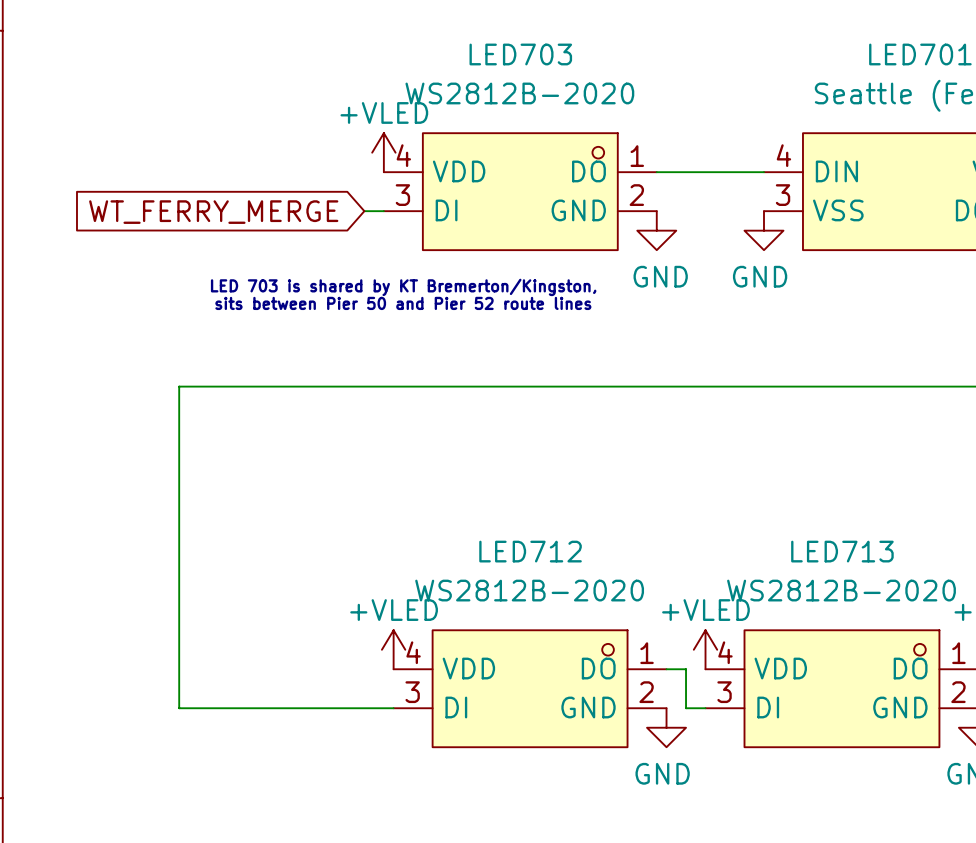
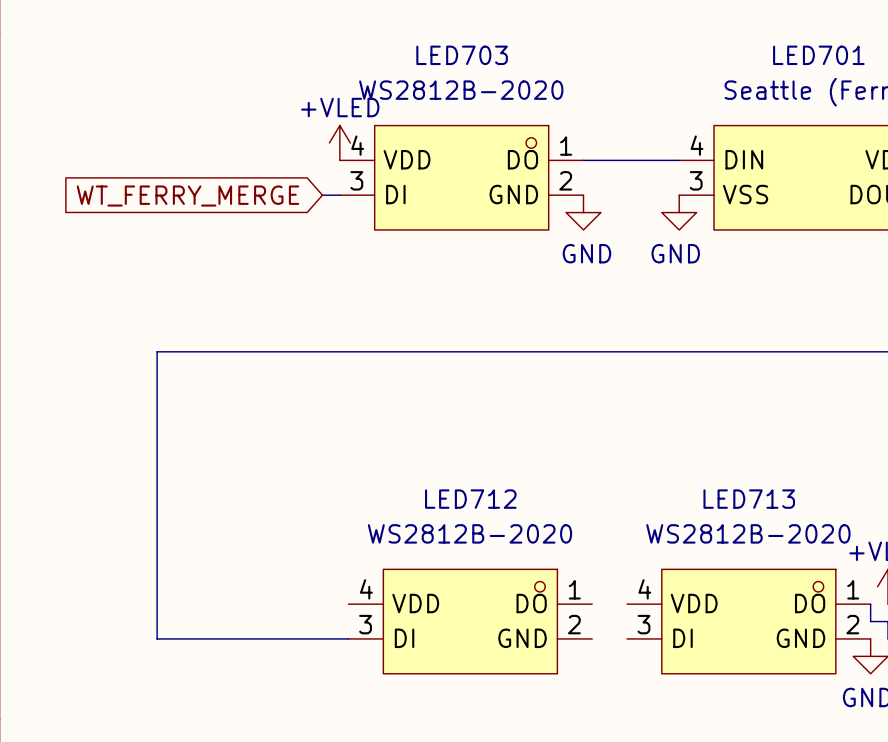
text: LED 703 is shared by KT Bremerton/Kingston, (403, 287) -> none
text: sits between Pier 50 and Pier 52 route lines (403, 303) -> none
power symbol: +VLED (393, 649) -> none
power symbol: +VLED (705, 649) -> none
wire: (666, 669) (686, 669) (686, 708) (705, 708) -> none
power symbol: GND (666, 727) -> none

